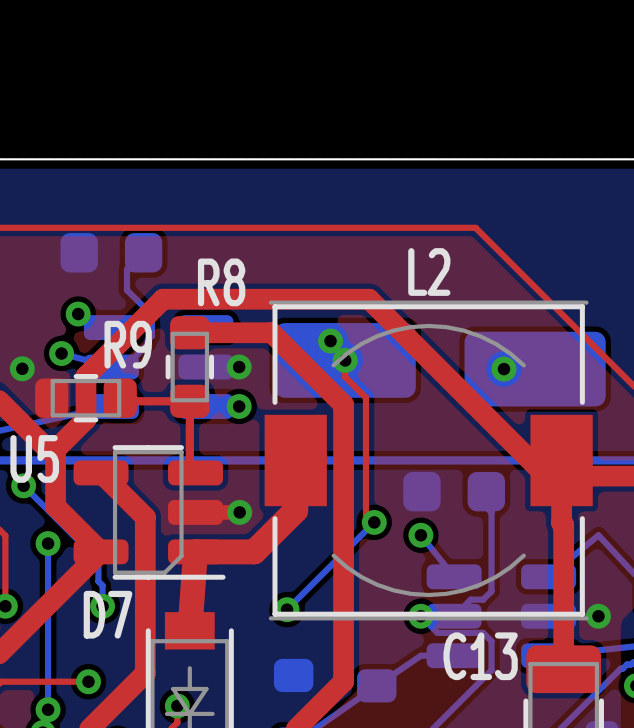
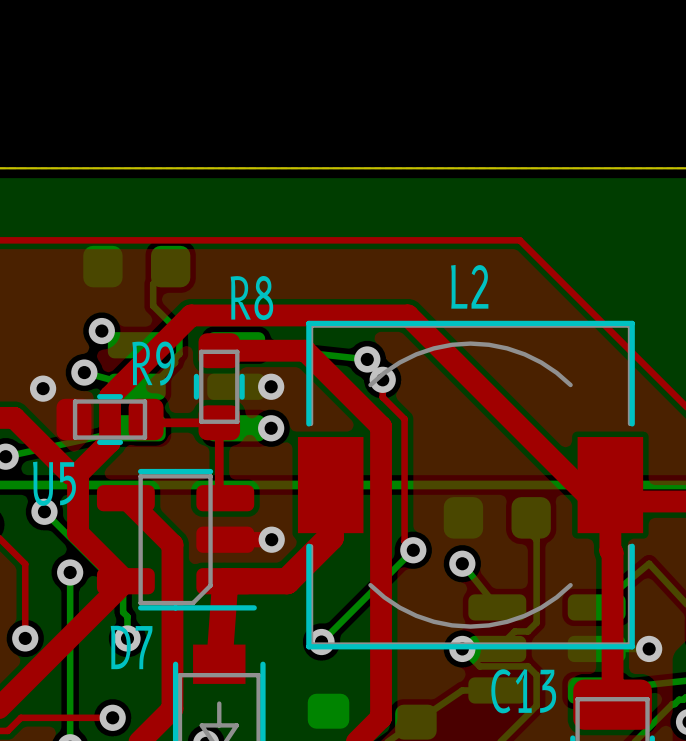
L2 footprint: [264, 300, 593, 621] -> [297, 320, 644, 650]
part: (345, 360) -> none
via: (503, 369) -> none
part: (535, 369) -> none

